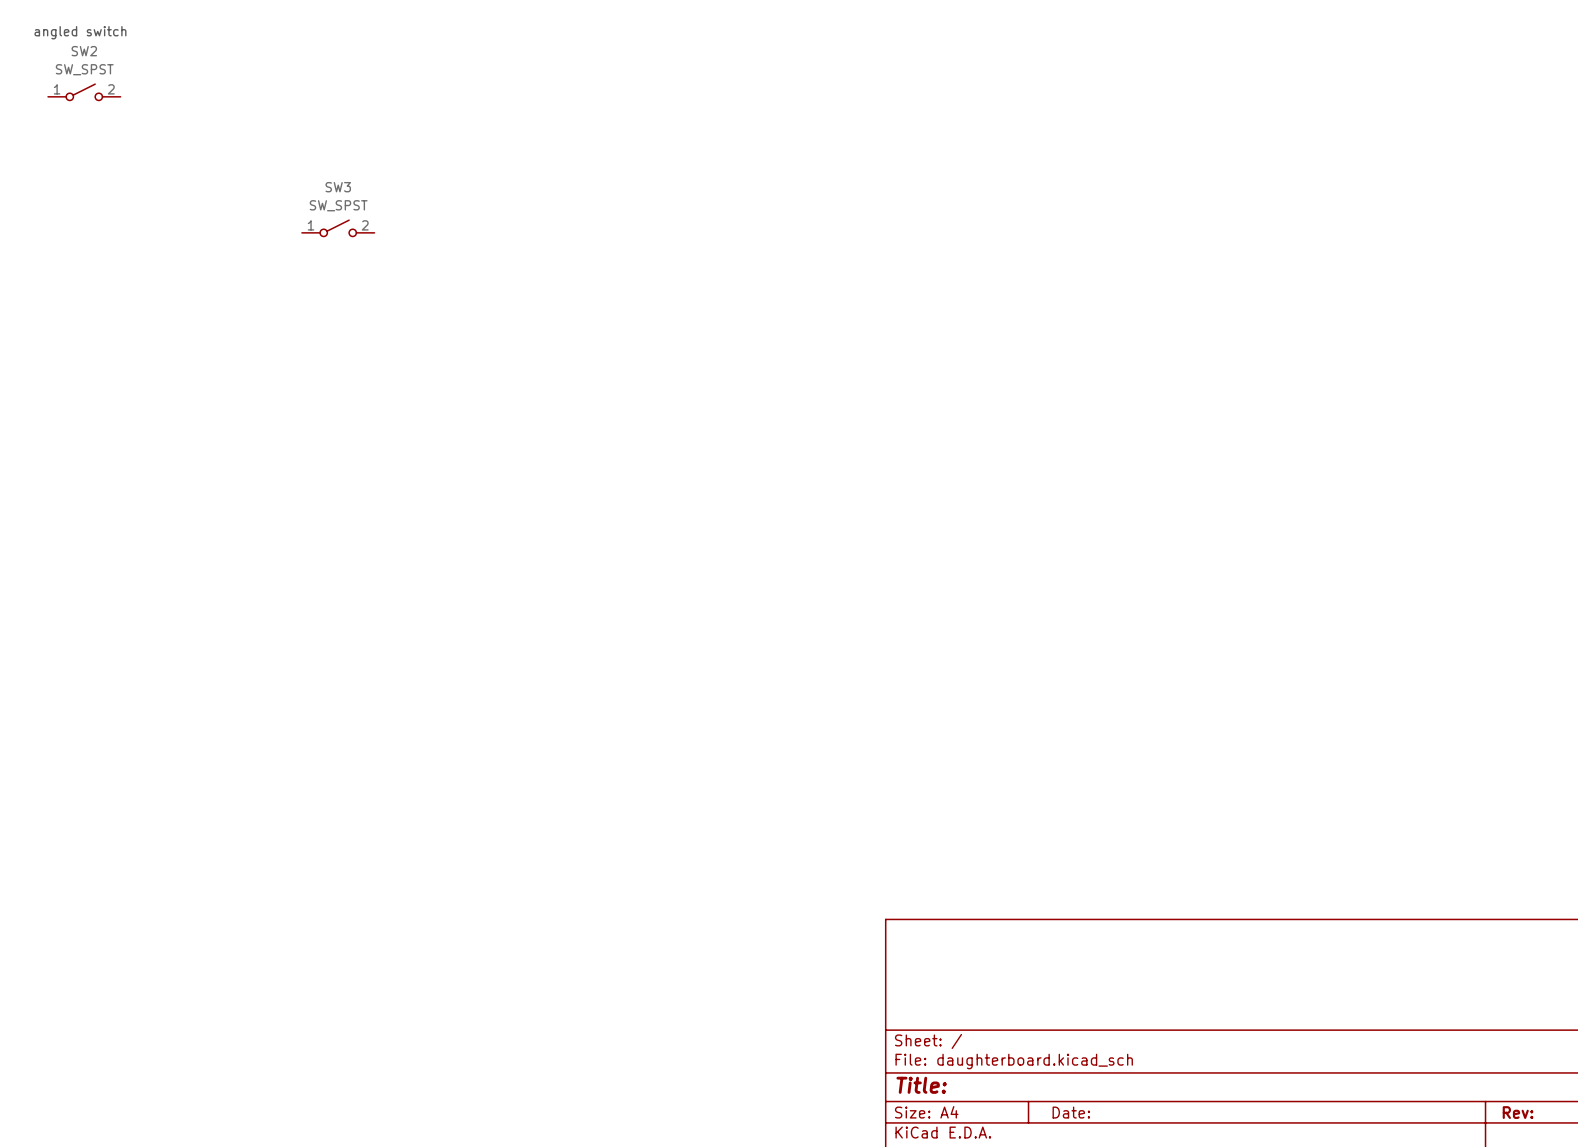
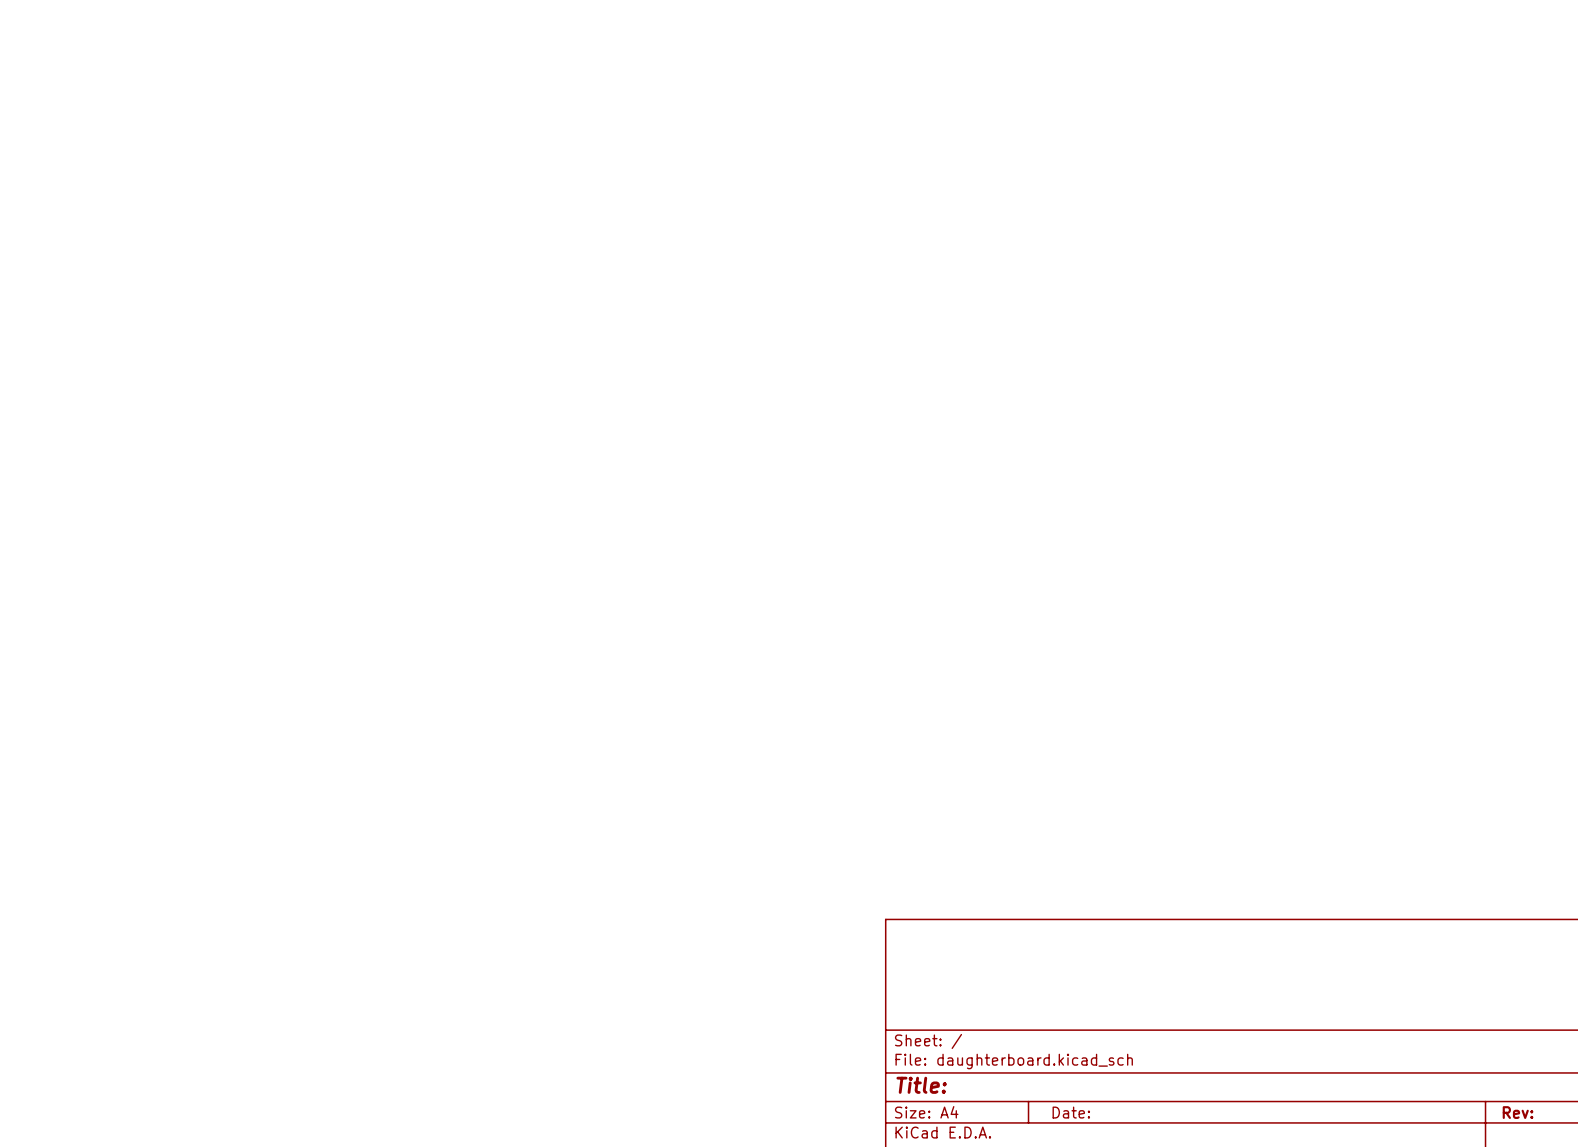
text: angled switch (80, 32) -> none
SW2: SW_SPST (84, 92) -> none
SW3: SW_SPST (338, 228) -> none

